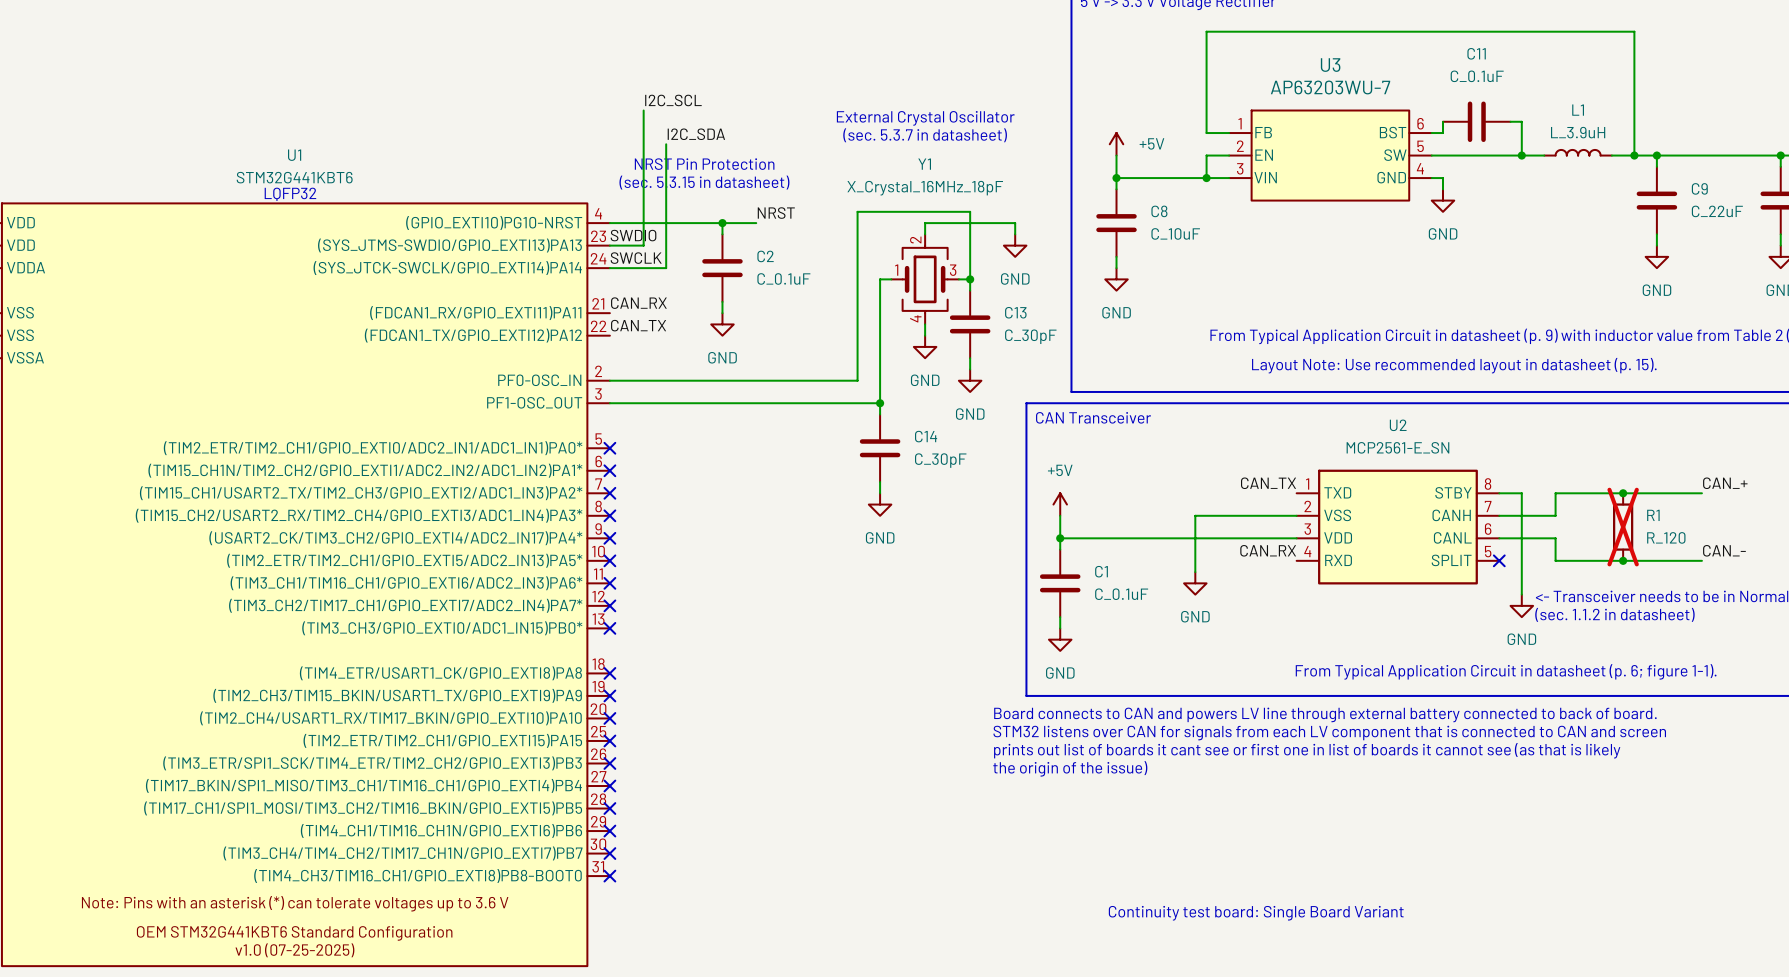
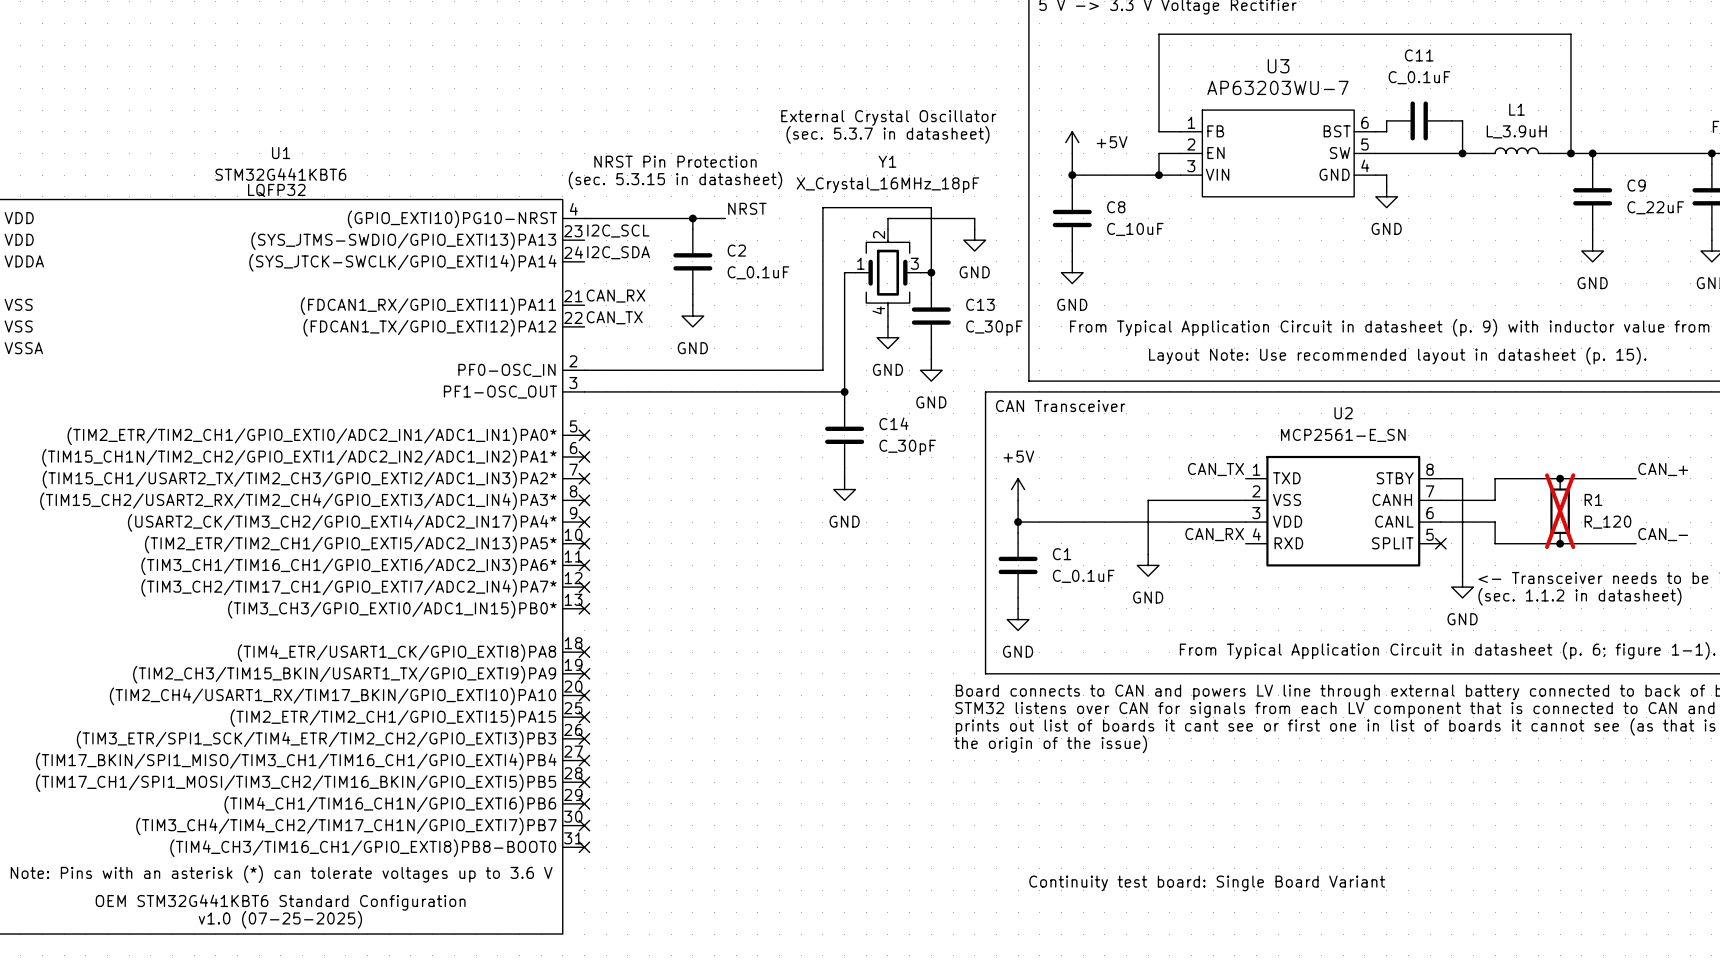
label: I2C_SCL (673, 100) -> none
wire: (643, 110) (643, 245) (609, 245) -> none
label: I2C_SDA (696, 134) -> none
wire: (666, 144) (666, 268) (609, 268) -> none
label: SWDIO (633, 235) -> I2C_SCL (618, 231)
label: SWCLK (636, 258) -> I2C_SDA (618, 252)

